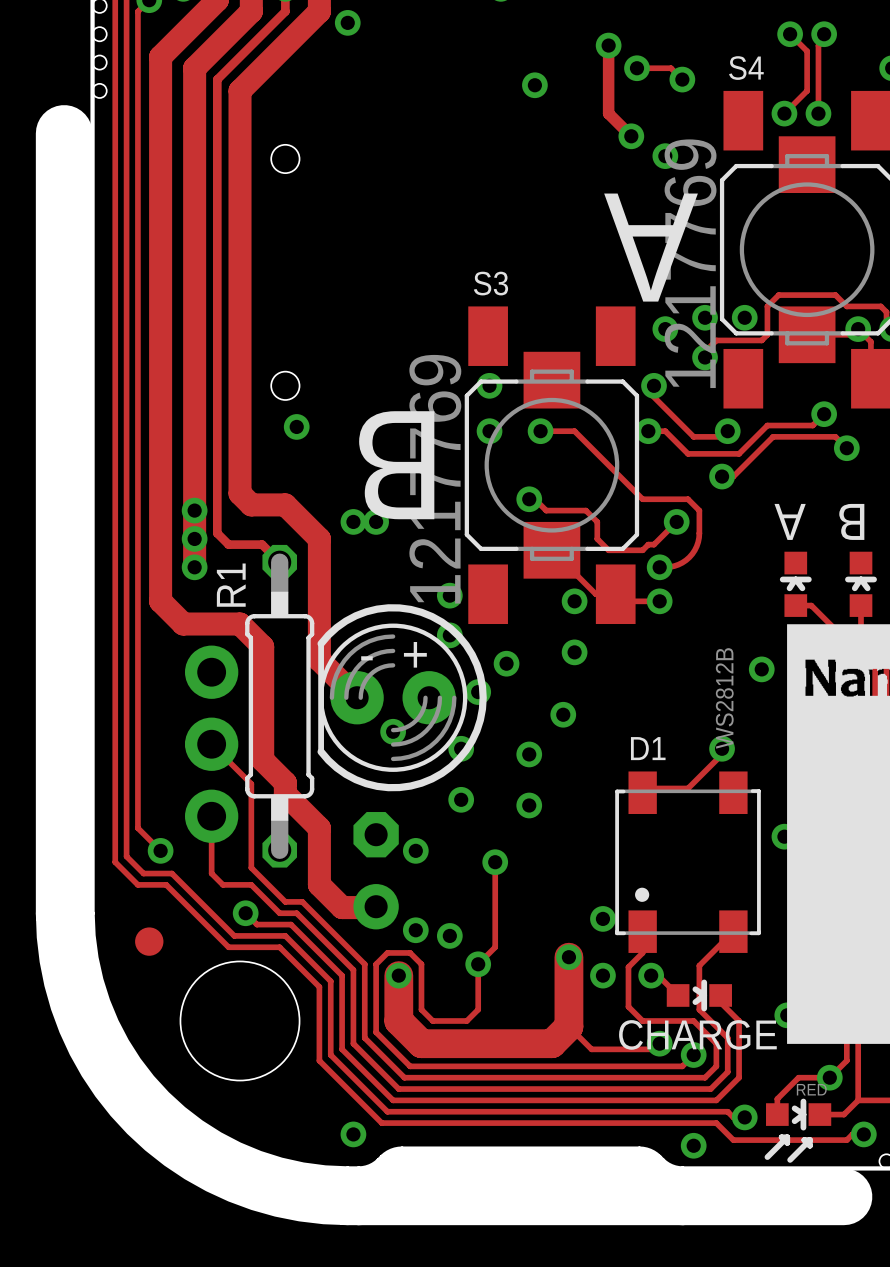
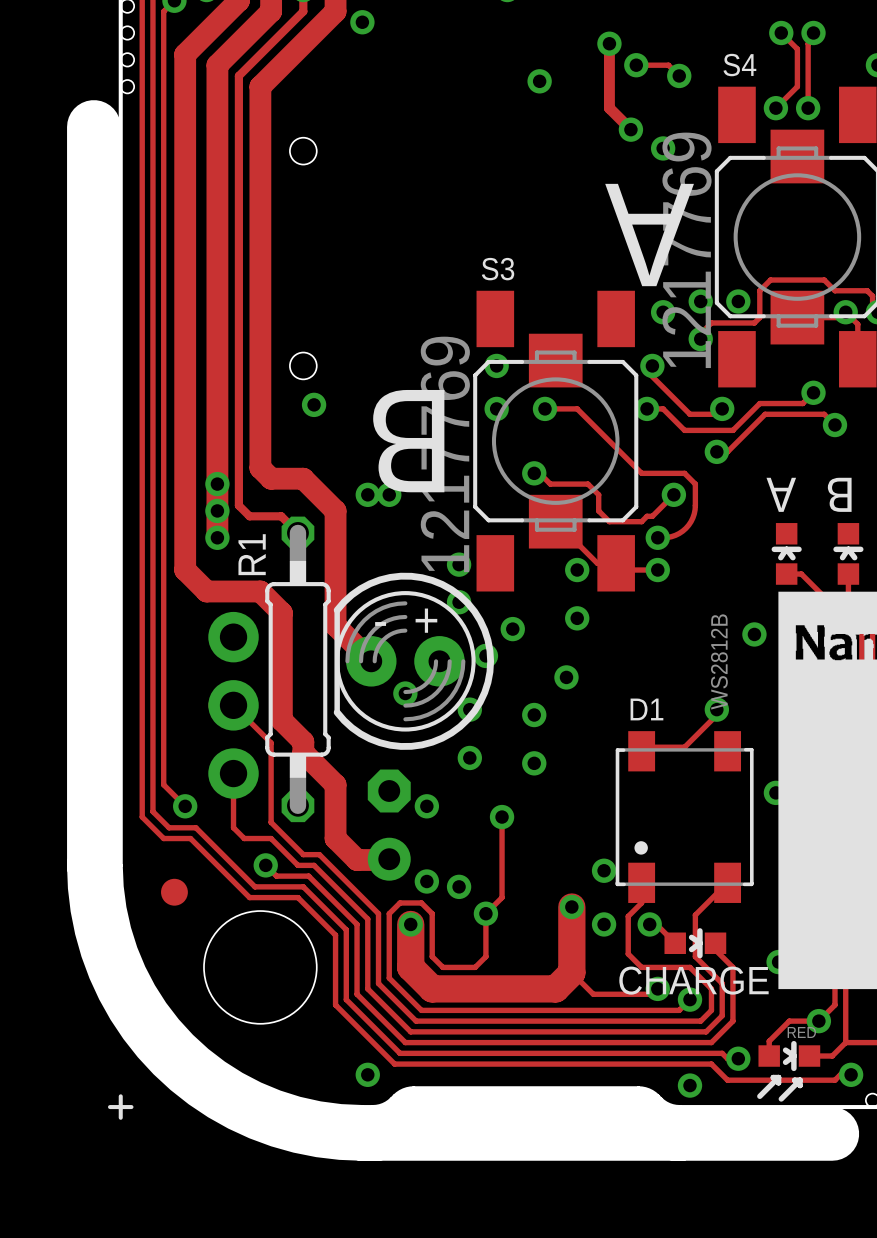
line: none -> (120, 1096) (120, 1117)
line: none -> (110, 1107) (131, 1107)

